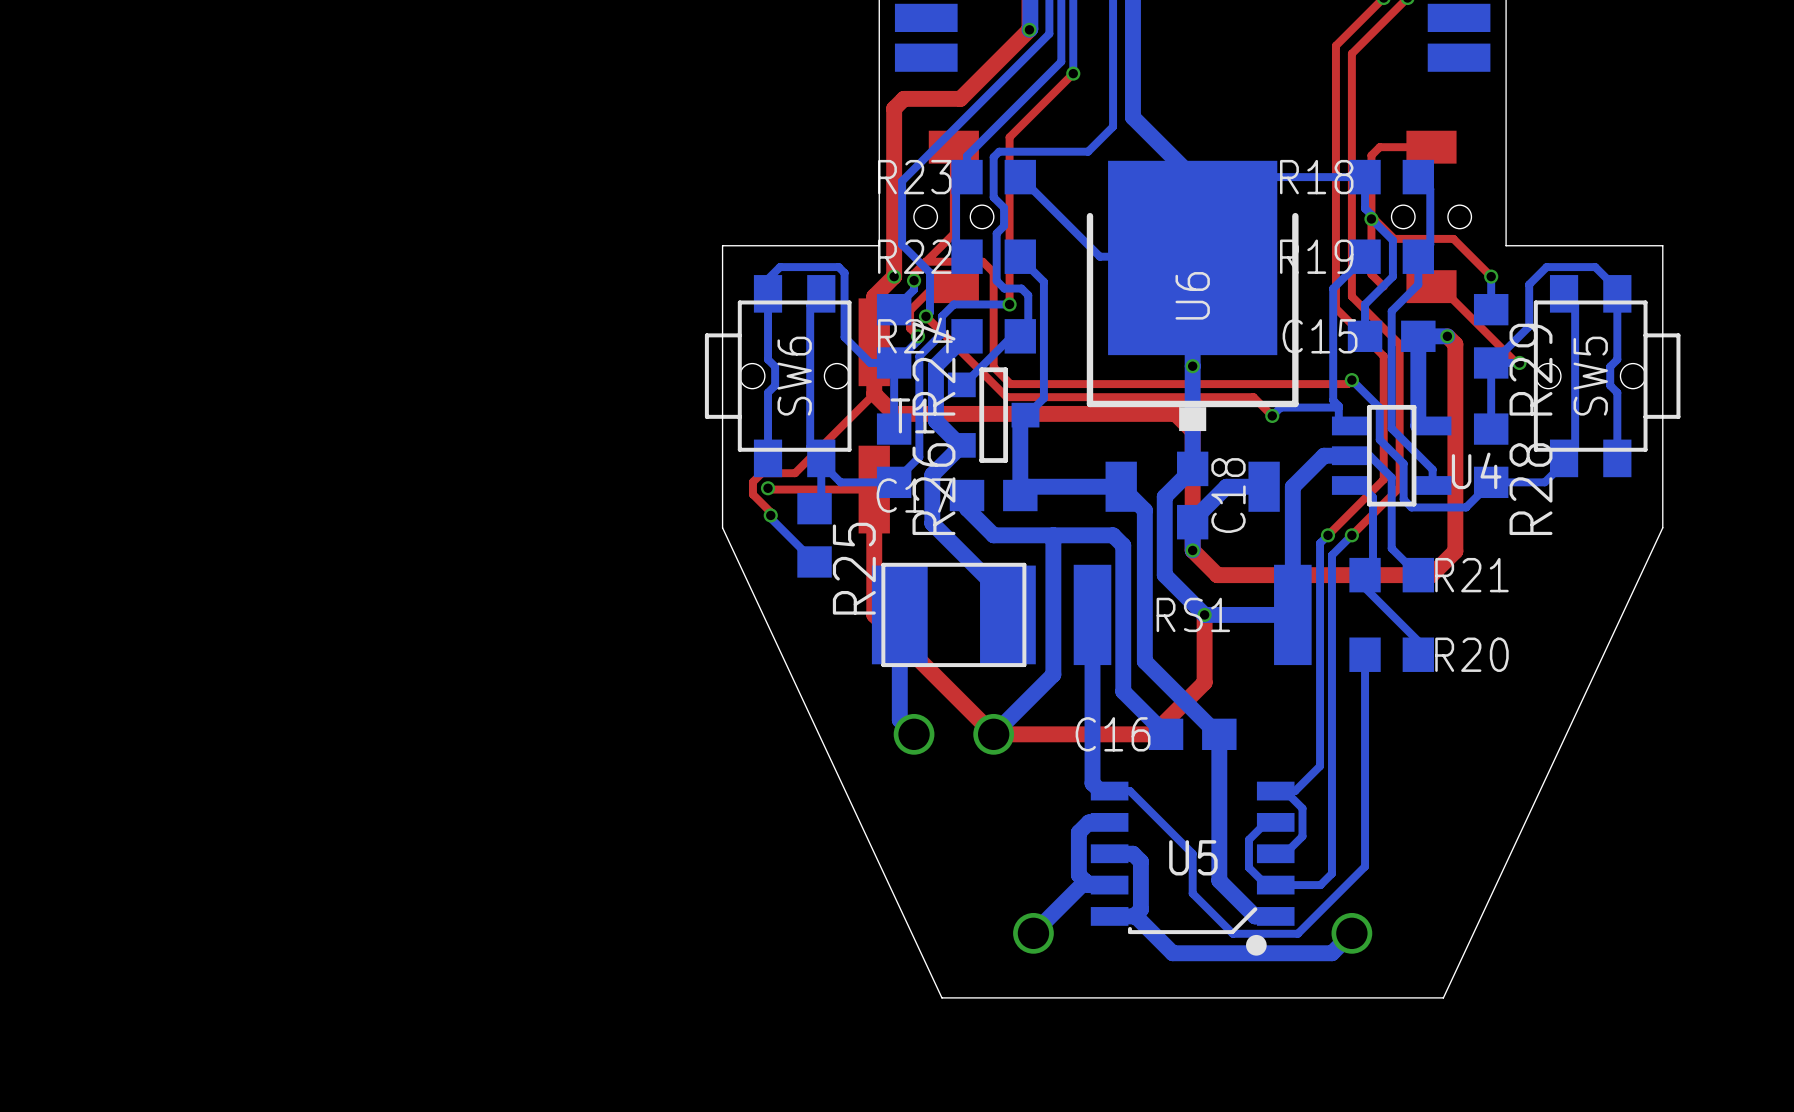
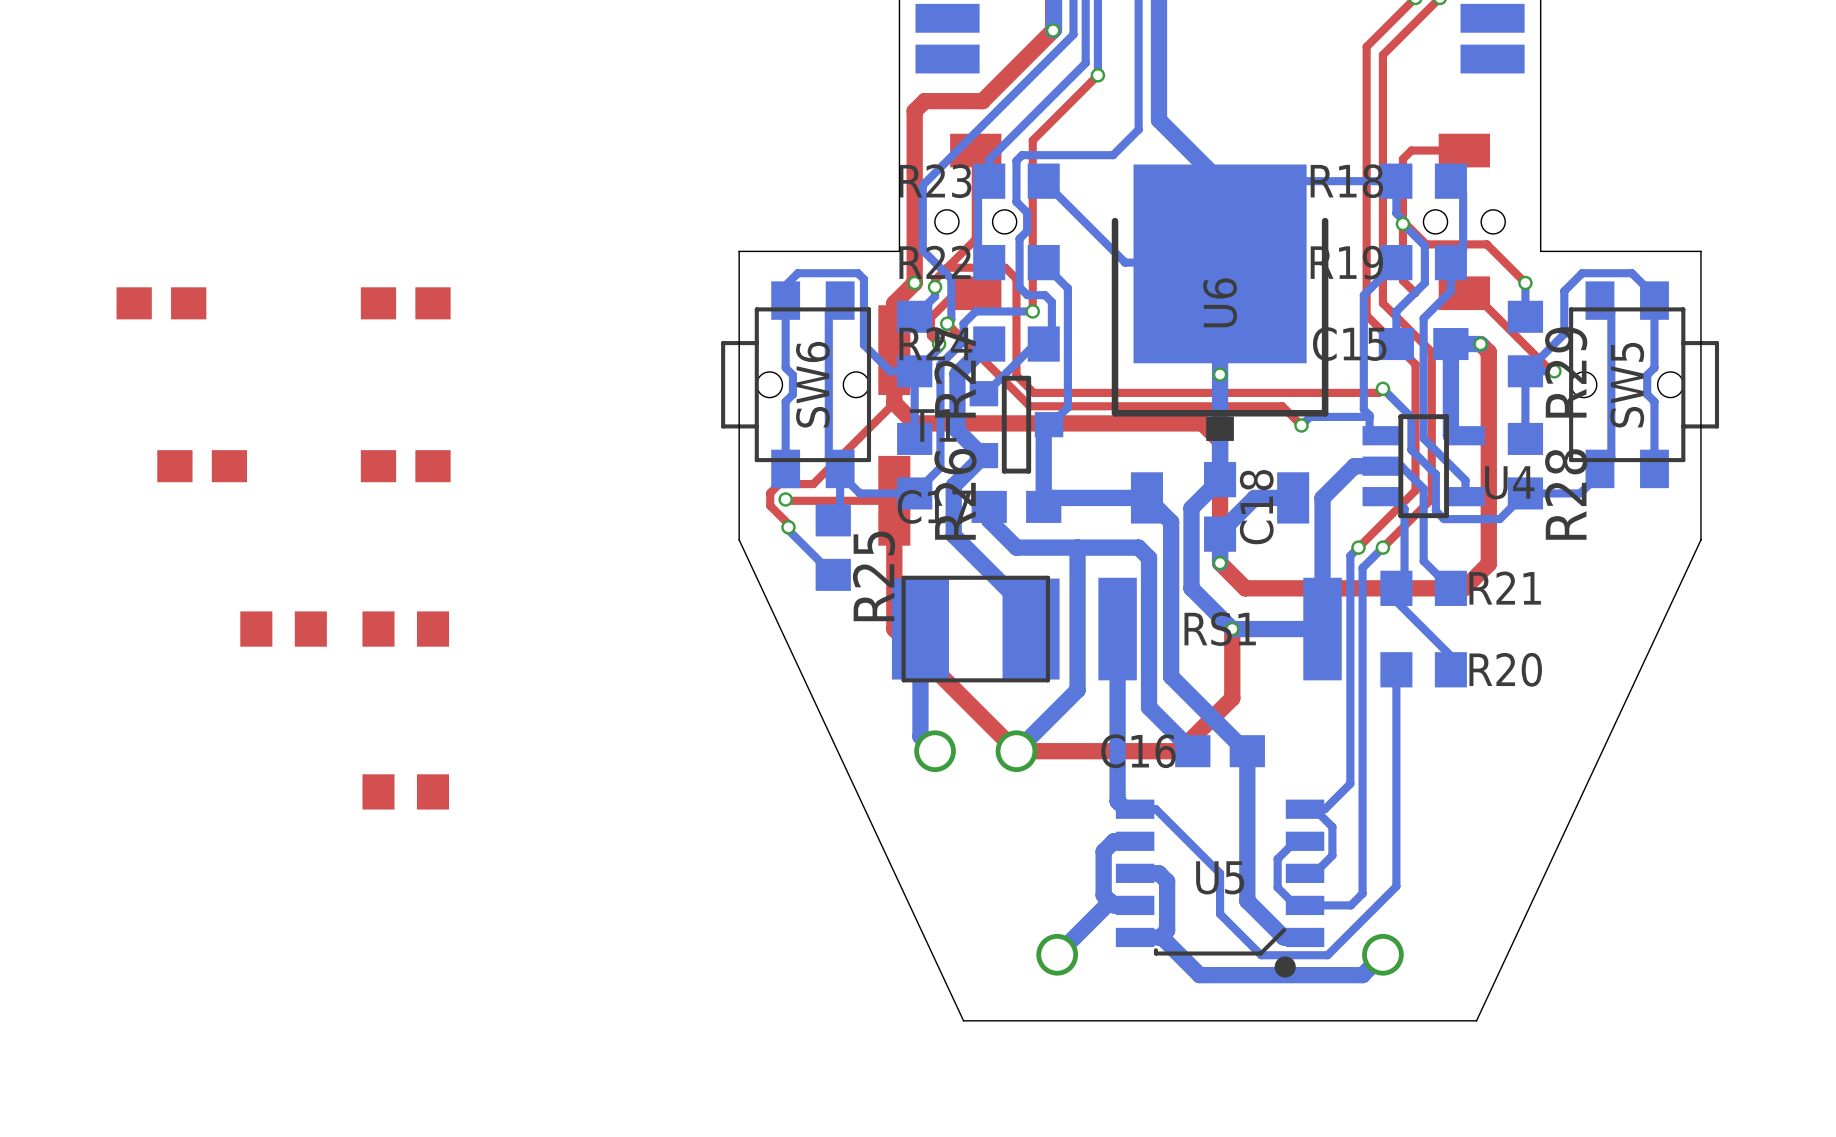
part: none -> (161, 303)
part: none -> (405, 303)
part: none -> (202, 466)
part: none -> (405, 466)
part: none -> (283, 629)
part: none -> (405, 629)
part: none -> (405, 791)

